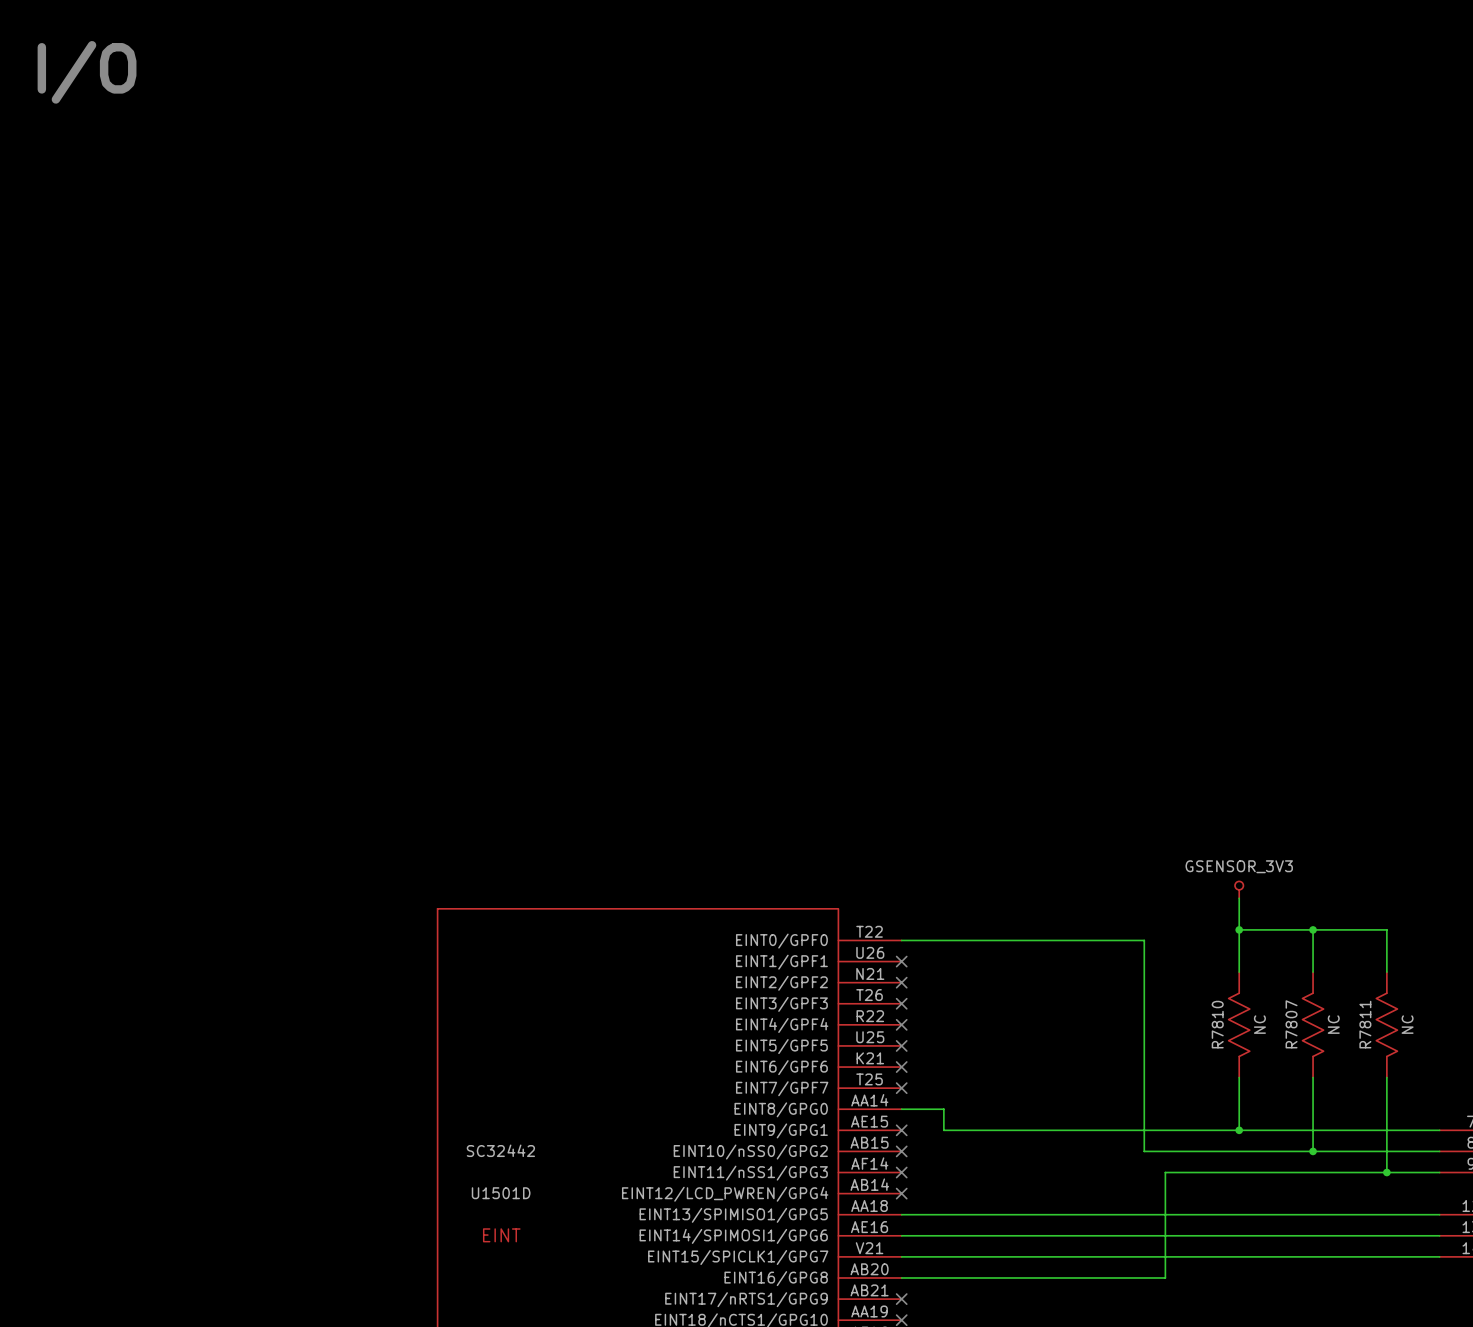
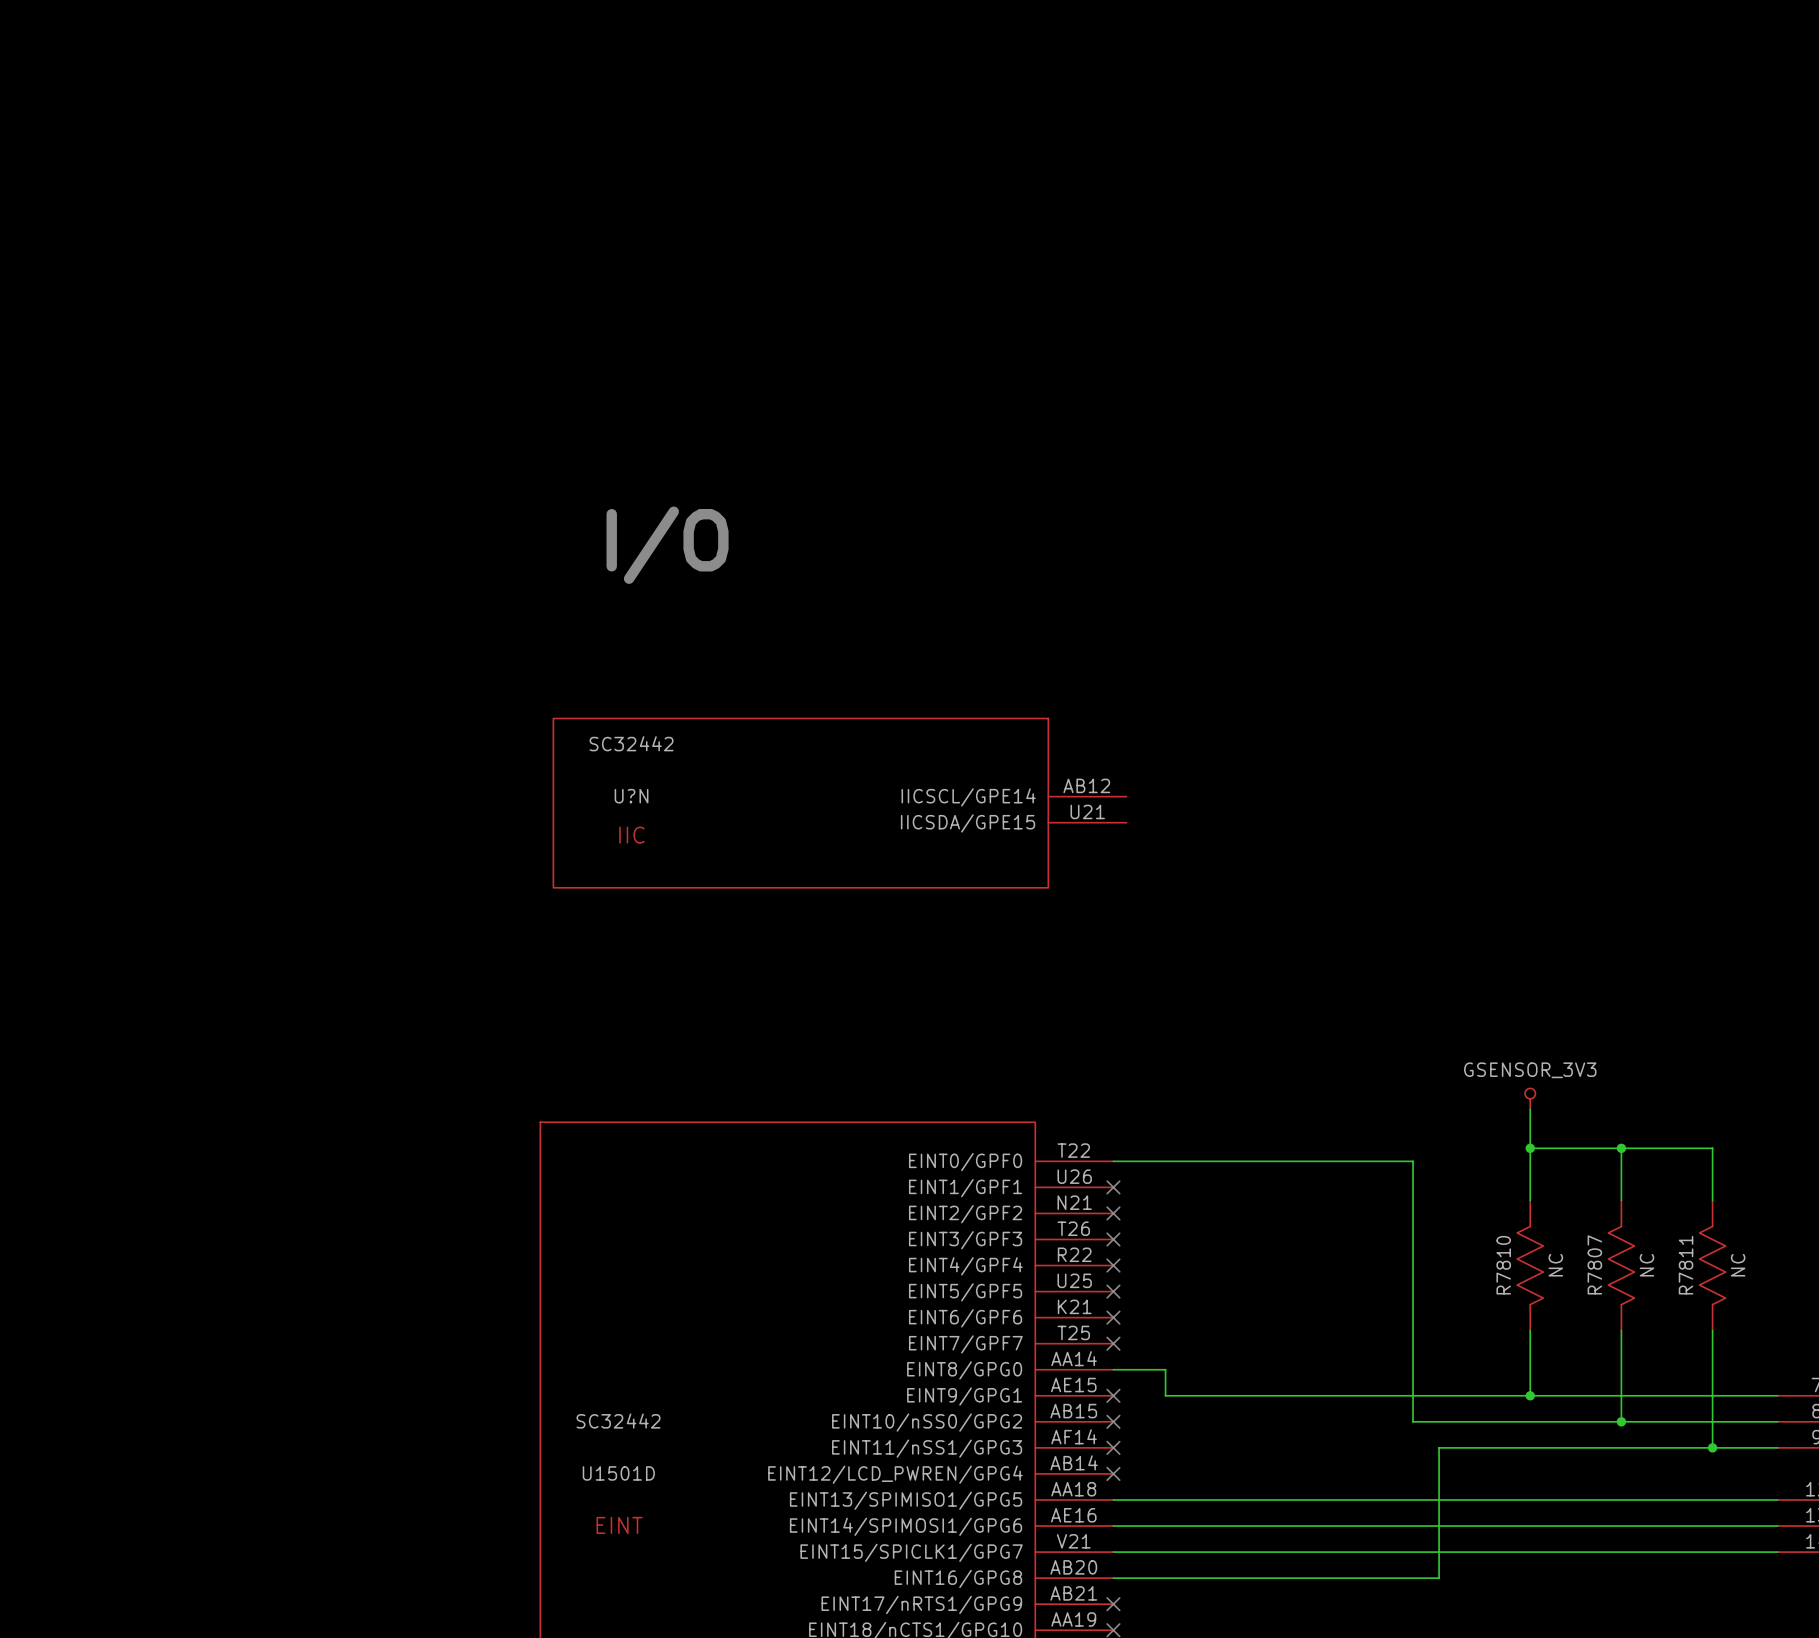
text: I/O (87, 72) -> none
text: none -> I/O (667, 545)
U?N: none -> SC32442 (839, 803)

